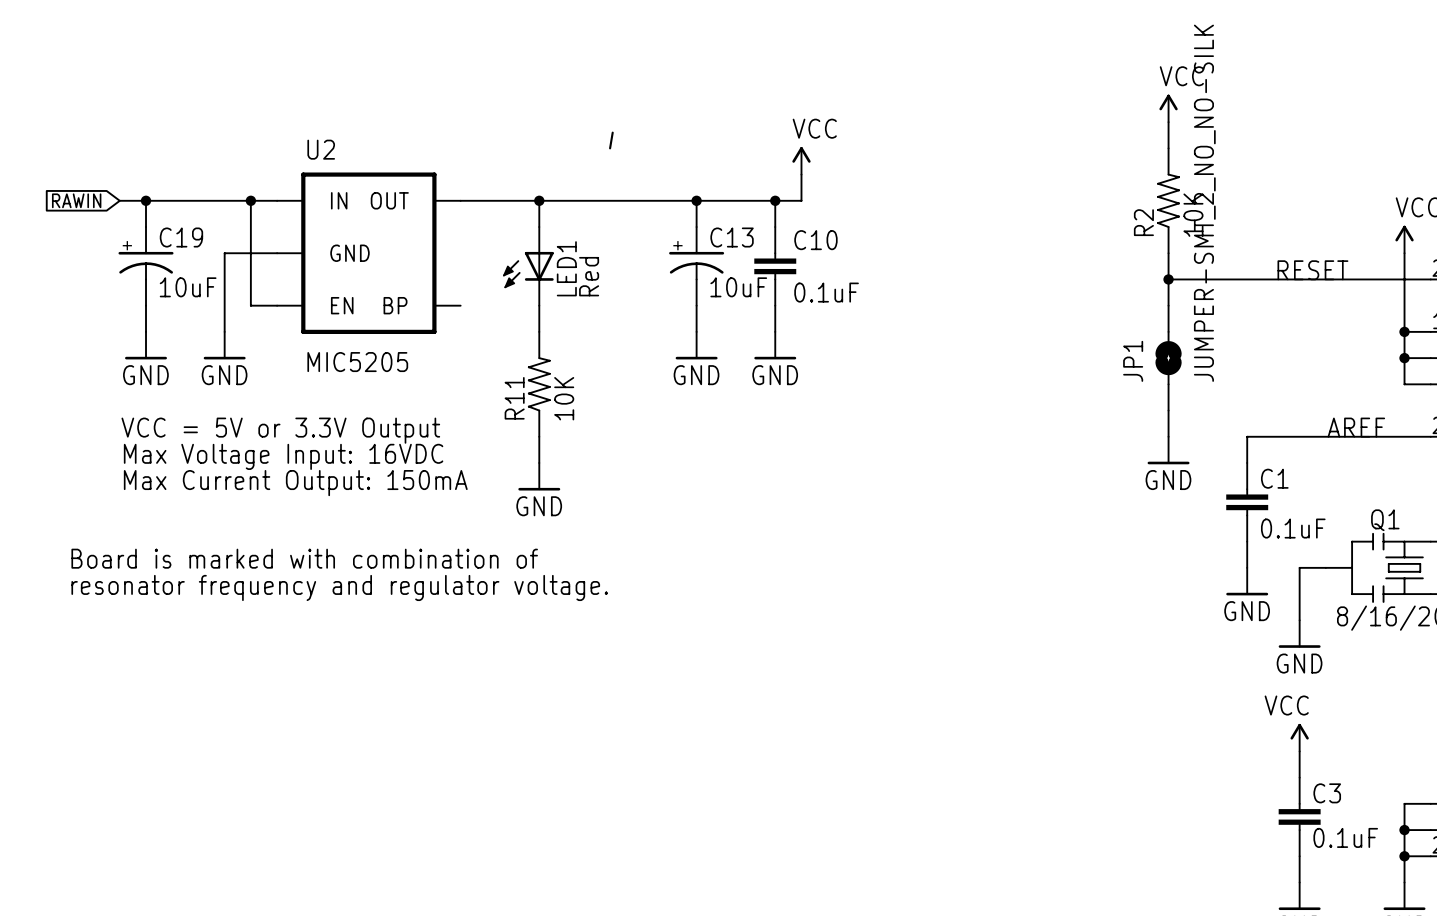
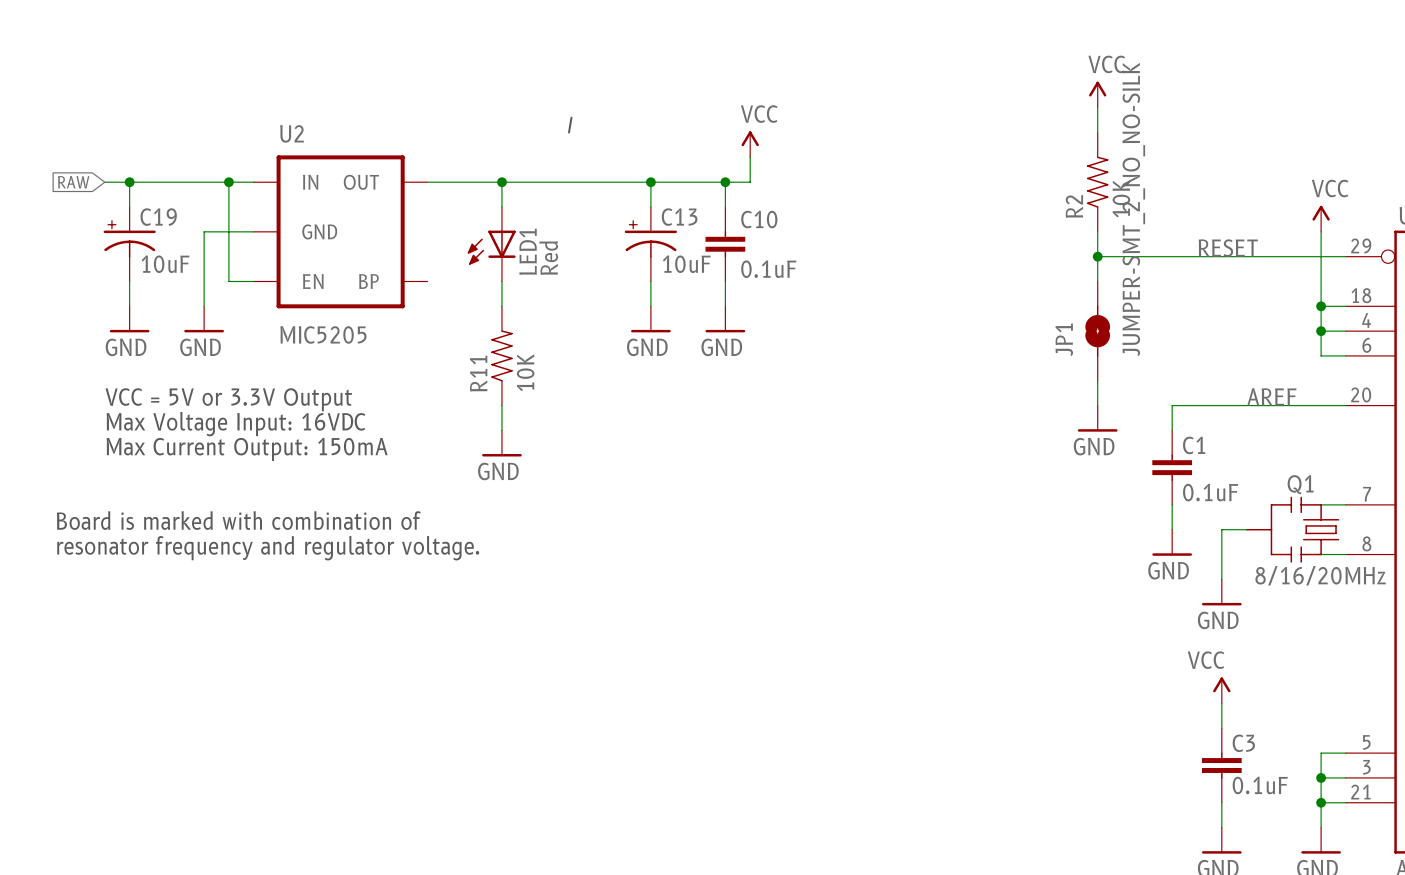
global label: RAWIN (76, 200) -> RAW (73, 182)

